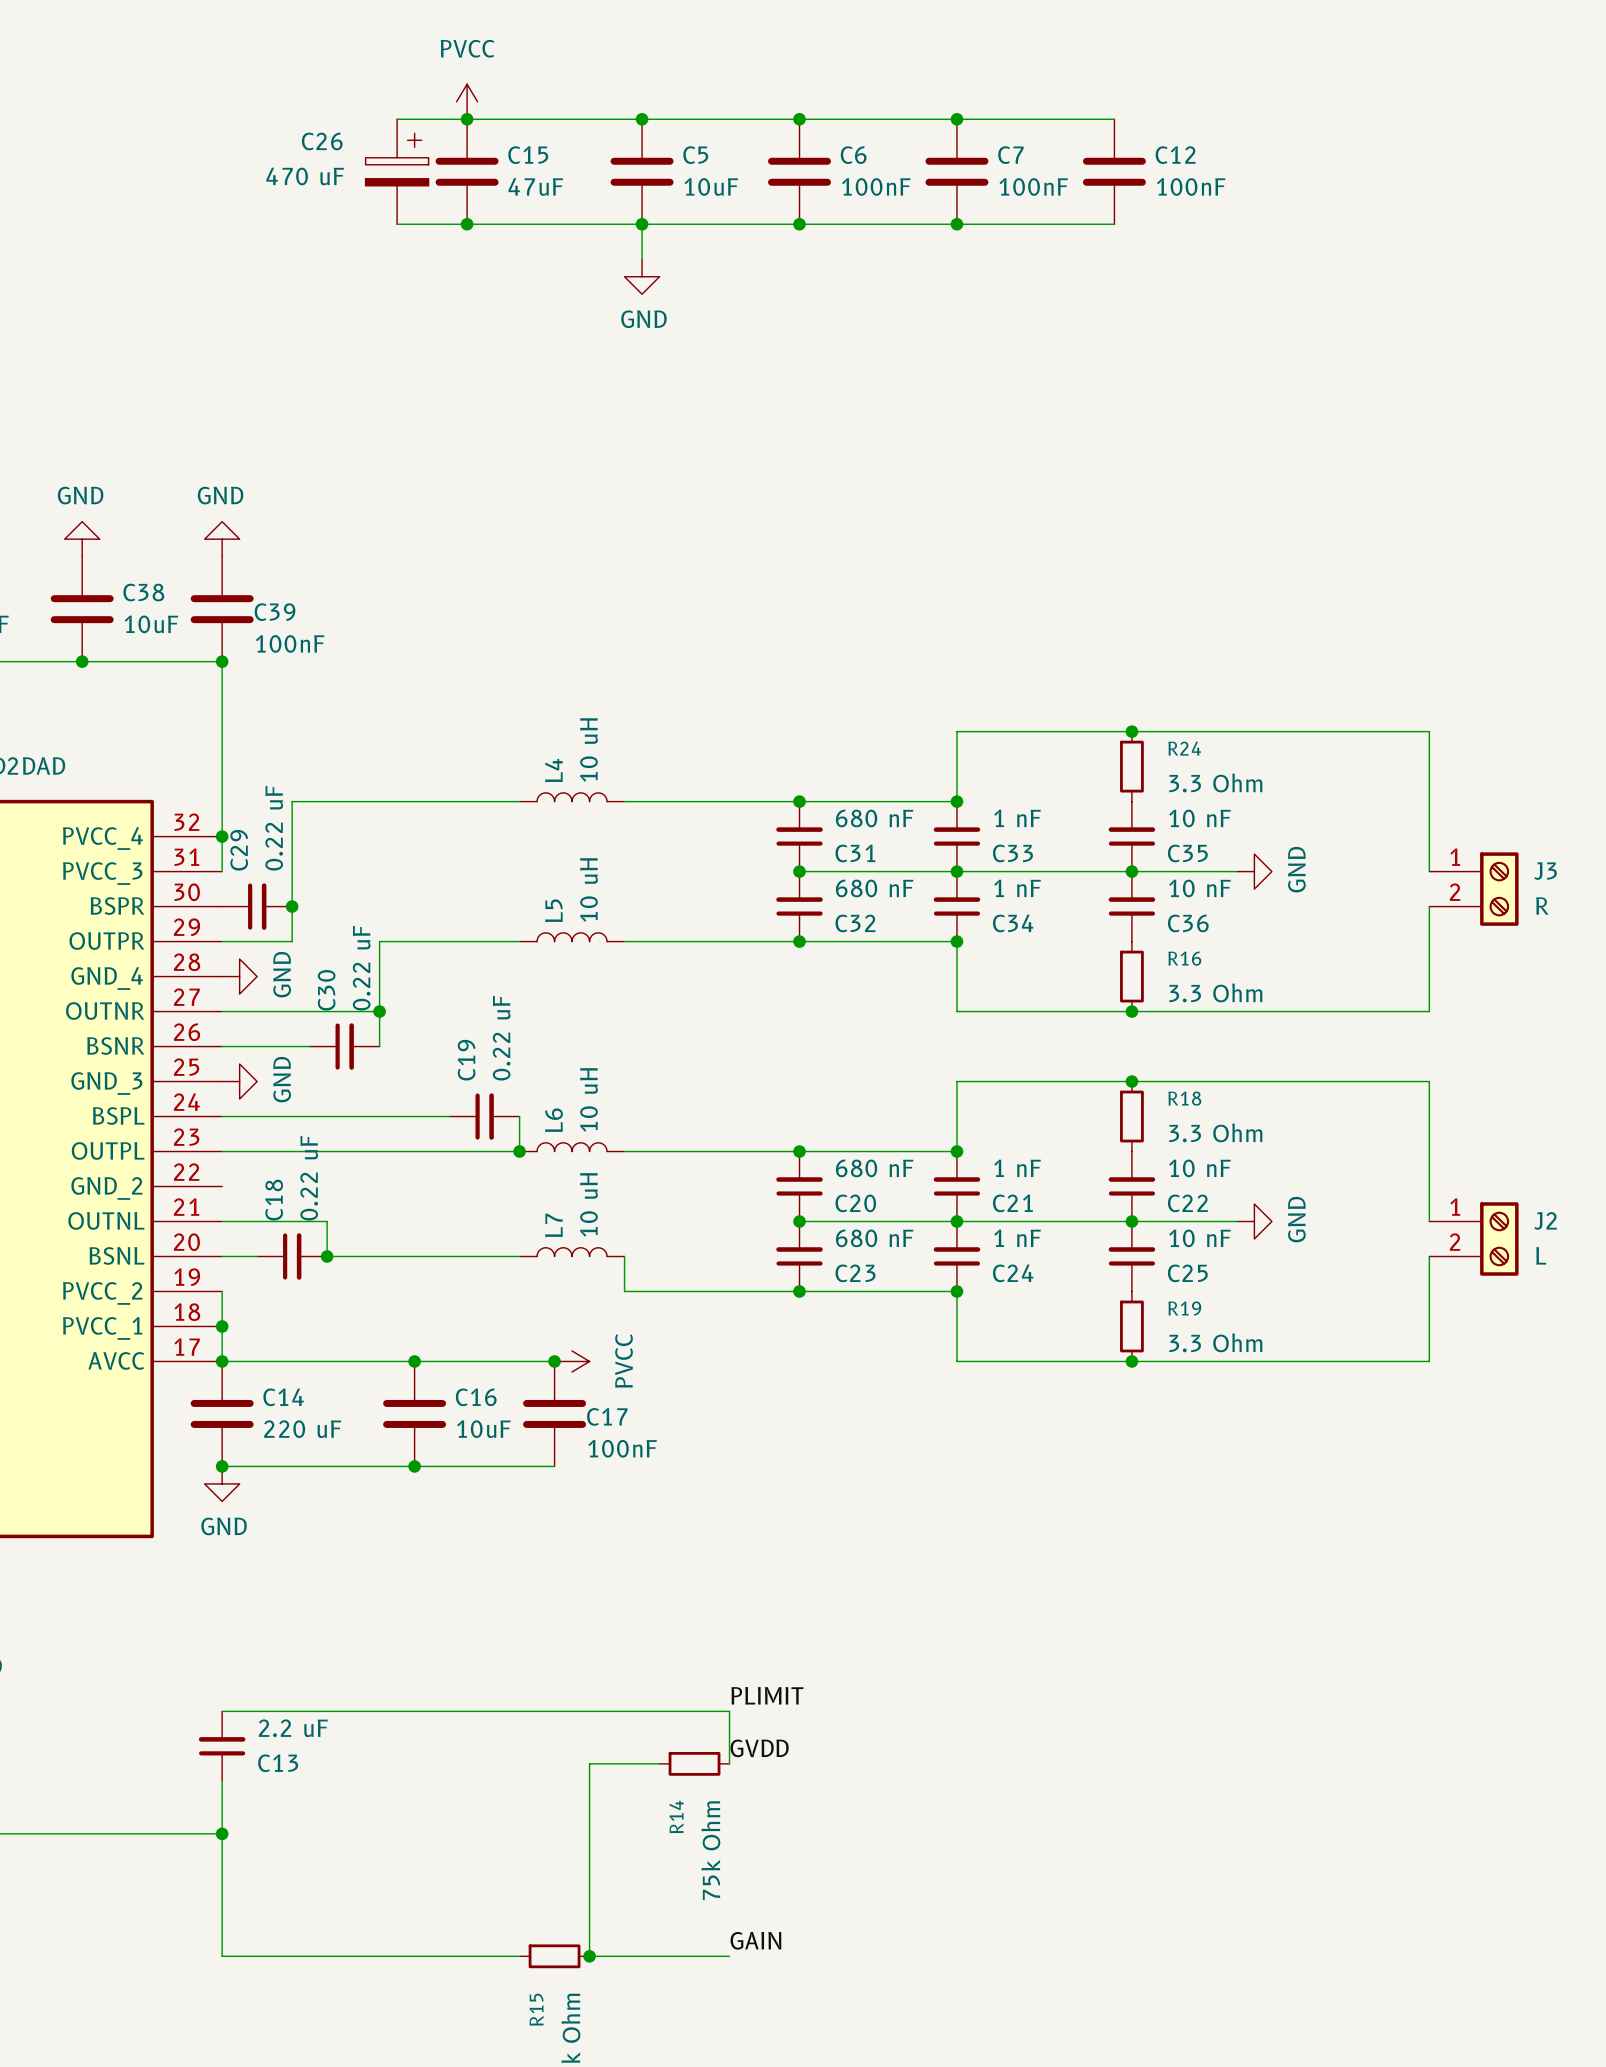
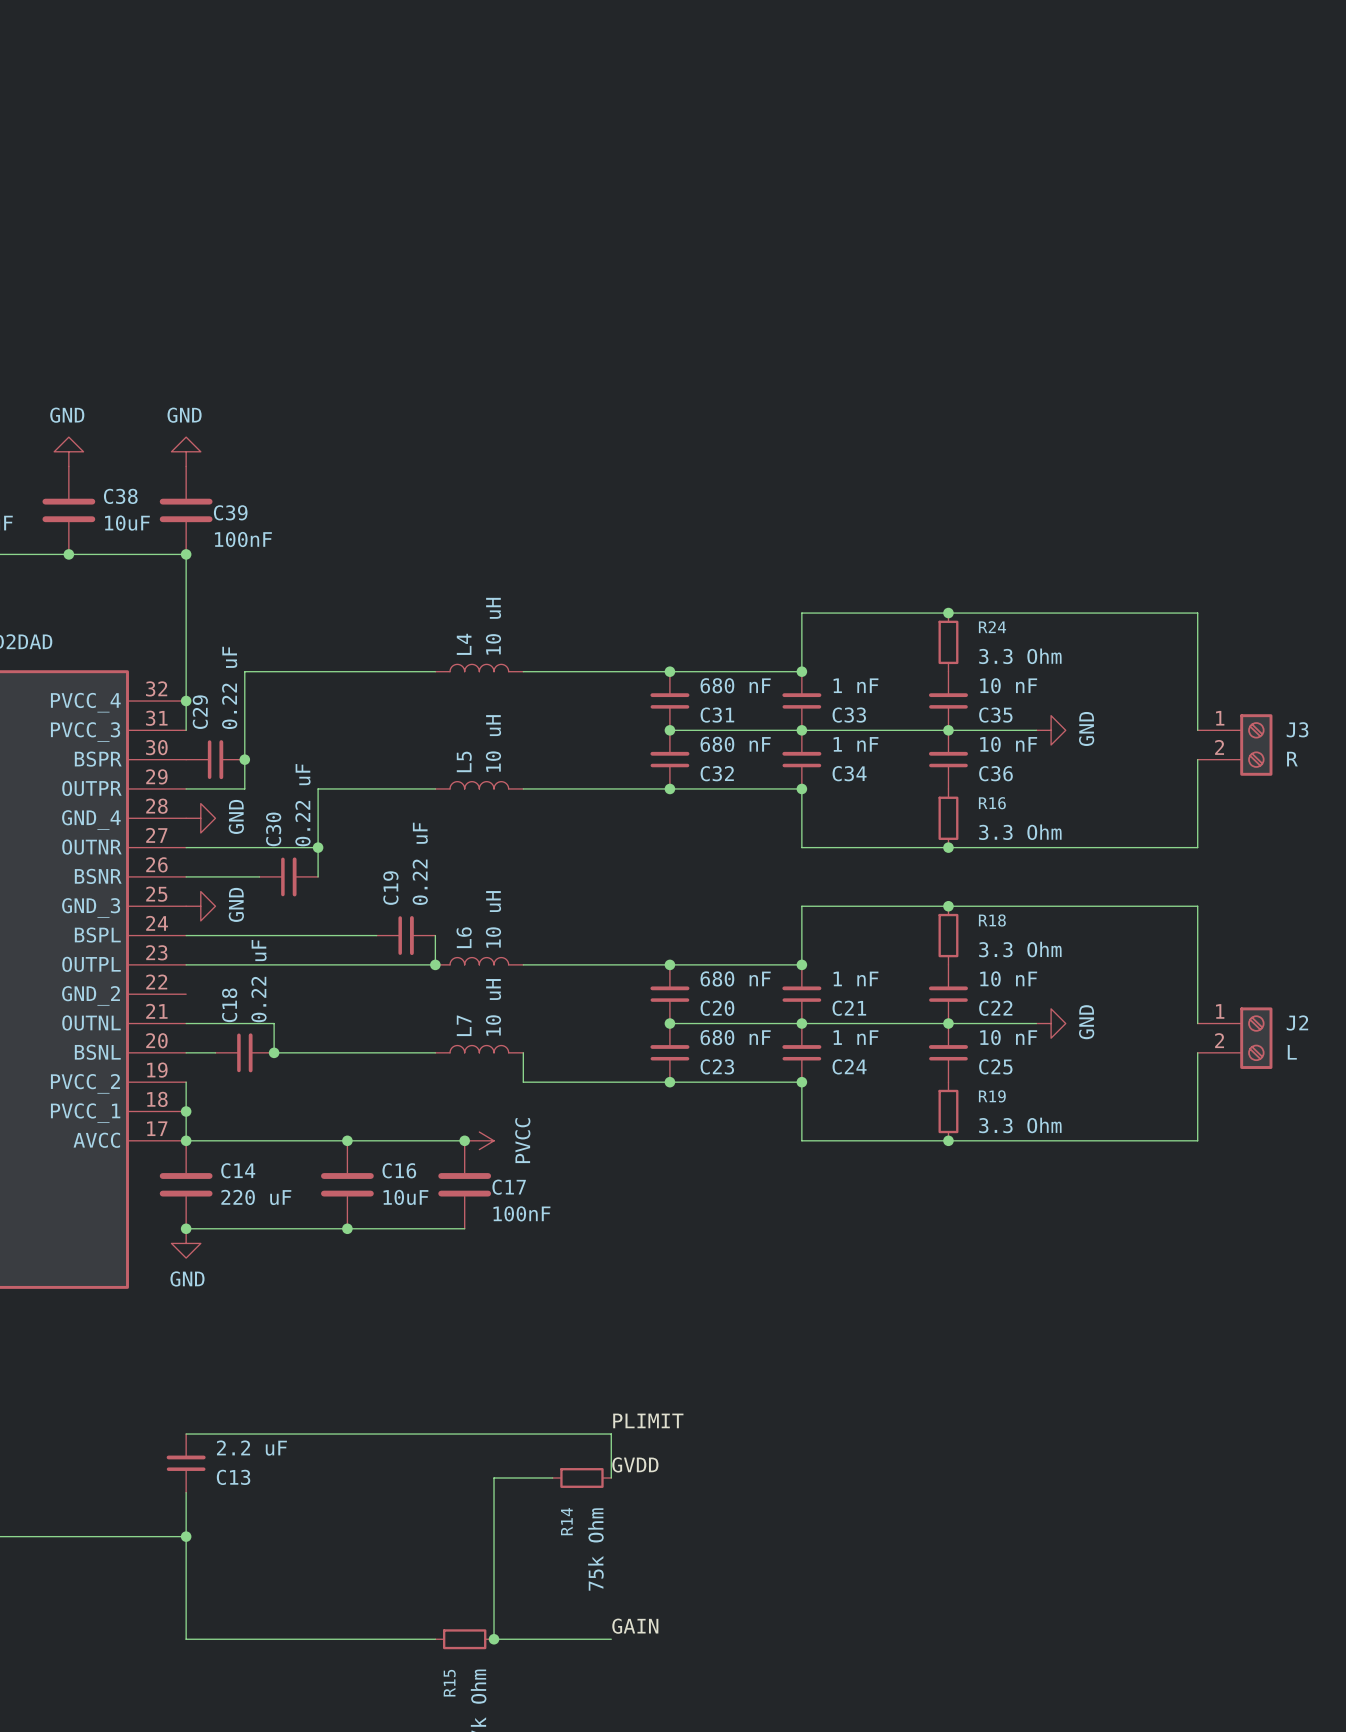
power symbol: PVCC (467, 101) -> none
wire: (397, 119) (1114, 119) -> none
junction: (467, 119) -> none
junction: (642, 119) -> none
junction: (799, 119) -> none
junction: (956, 119) -> none
C26: 470 uF (397, 171) -> none
C15: 47uF (467, 171) -> none
C5: 10uF (642, 171) -> none
C6: 100nF (799, 171) -> none
C7: 100nF (956, 171) -> none
C12: 100nF (1114, 171) -> none
wire: (397, 224) (1114, 224) -> none
junction: (467, 224) -> none
wire: (642, 224) (642, 259) -> none
junction: (642, 224) -> none
junction: (799, 224) -> none
junction: (956, 224) -> none
power symbol: GND (642, 276) -> none

